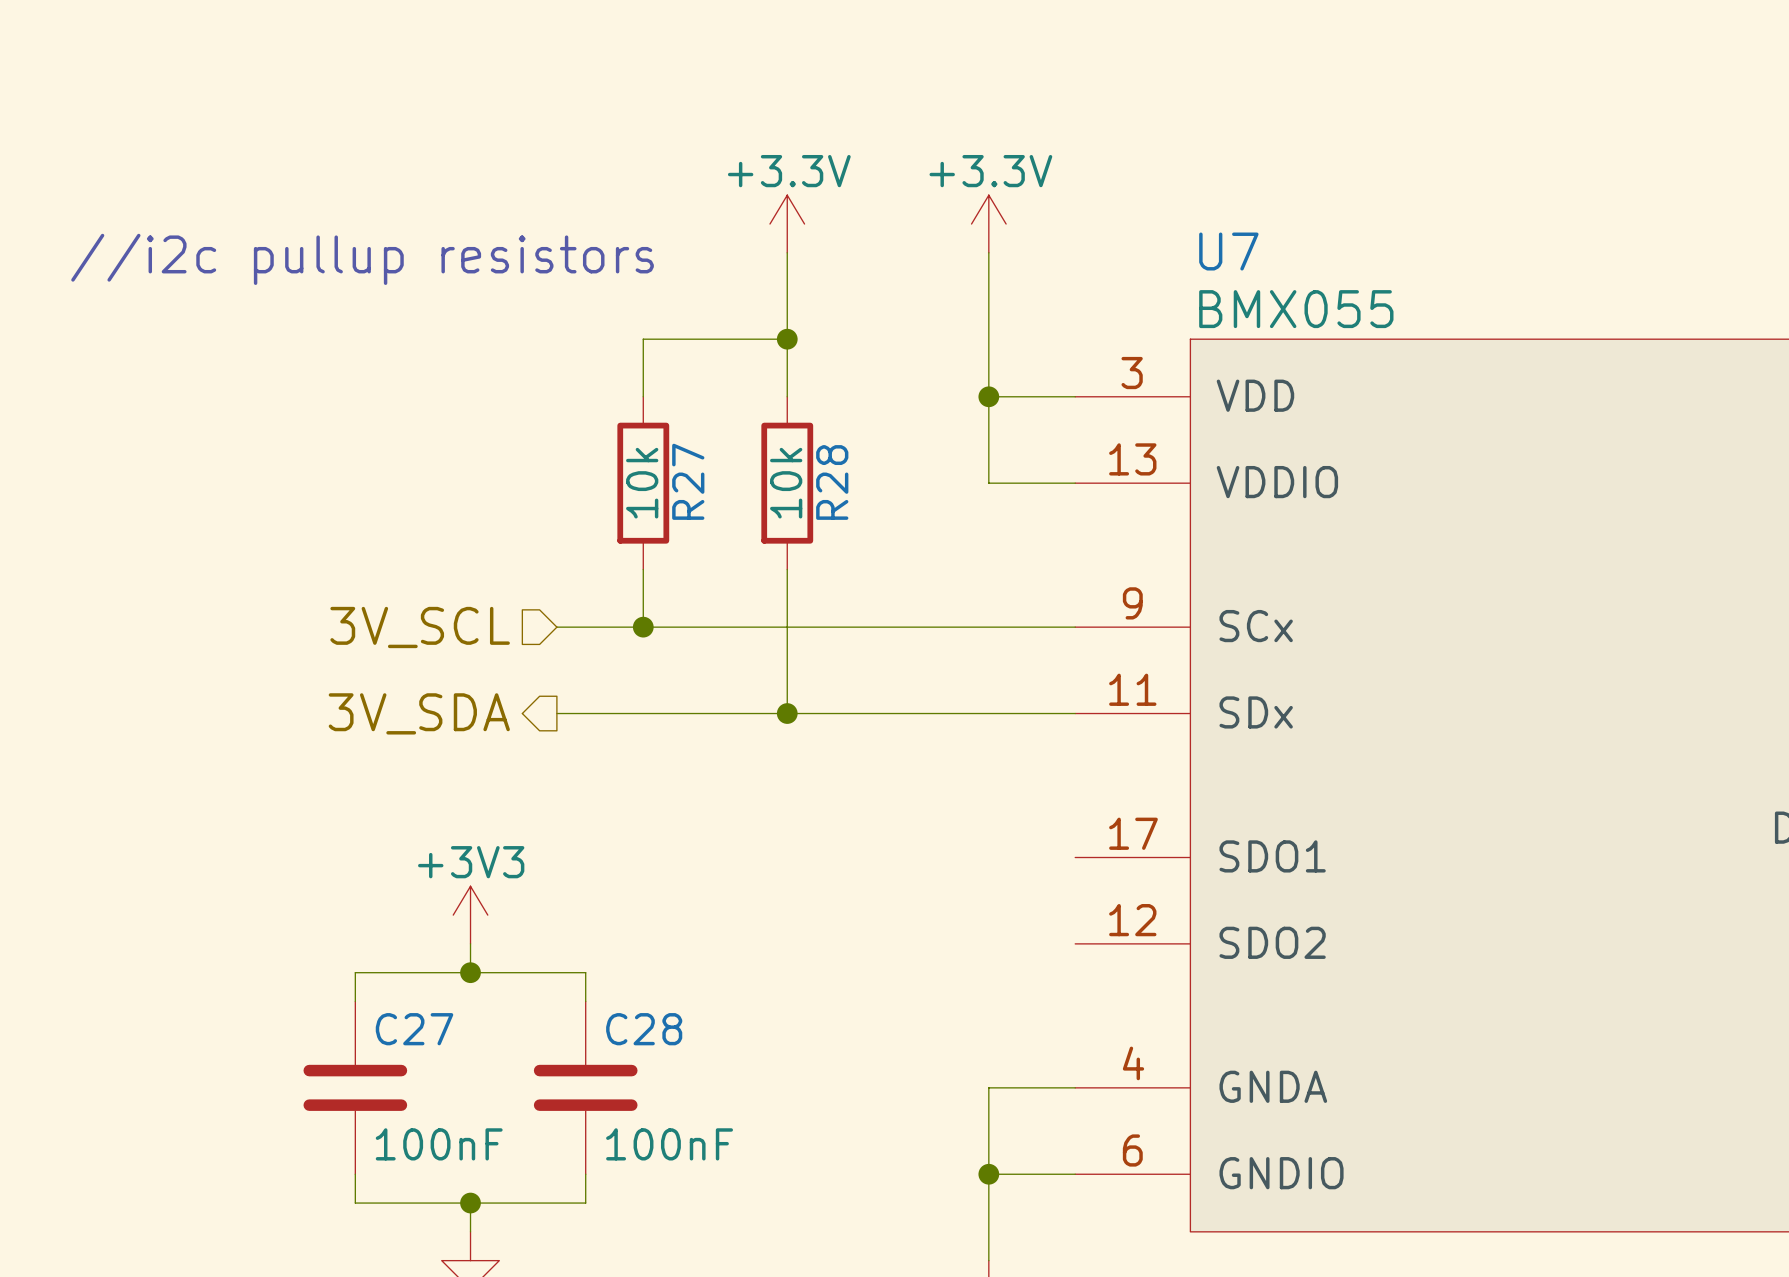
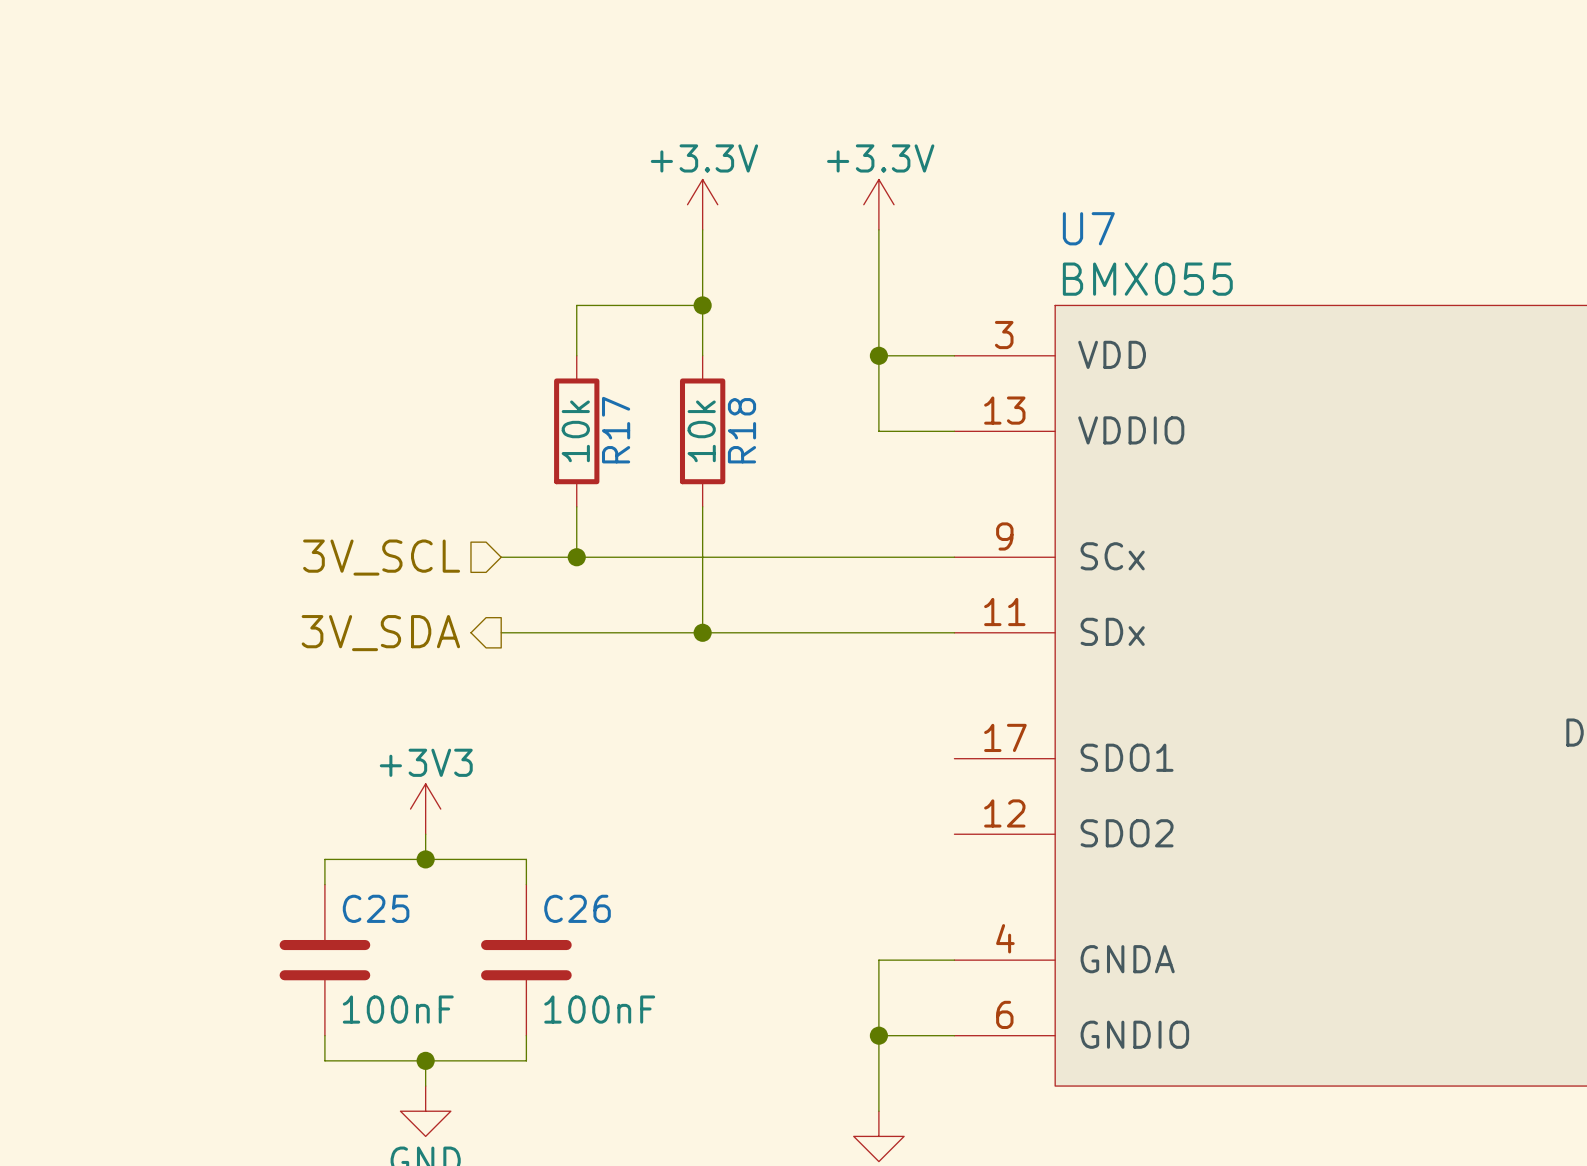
text: //i2c pullup resistors (362, 259) -> none
R27 name: R27 (688, 481) -> R17 (616, 430)
R28 name: R28 (832, 482) -> R18 (741, 430)
C27 name: C27 (414, 1029) -> C25 (376, 908)
C28 name: C28 (644, 1029) -> C26 (577, 908)

